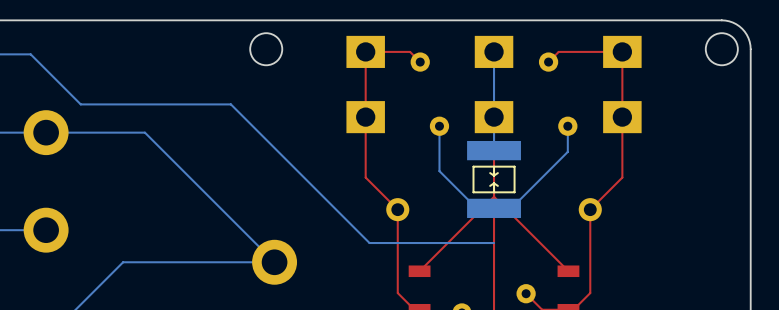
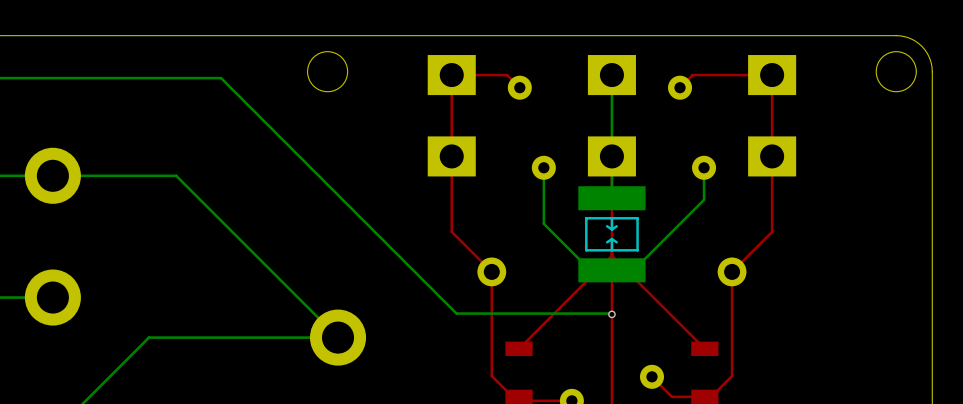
bottom track: (30, 54) (80, 104) (230, 104) -> (33, 78) (221, 78) (283, 140)
via: none -> (611, 314)

